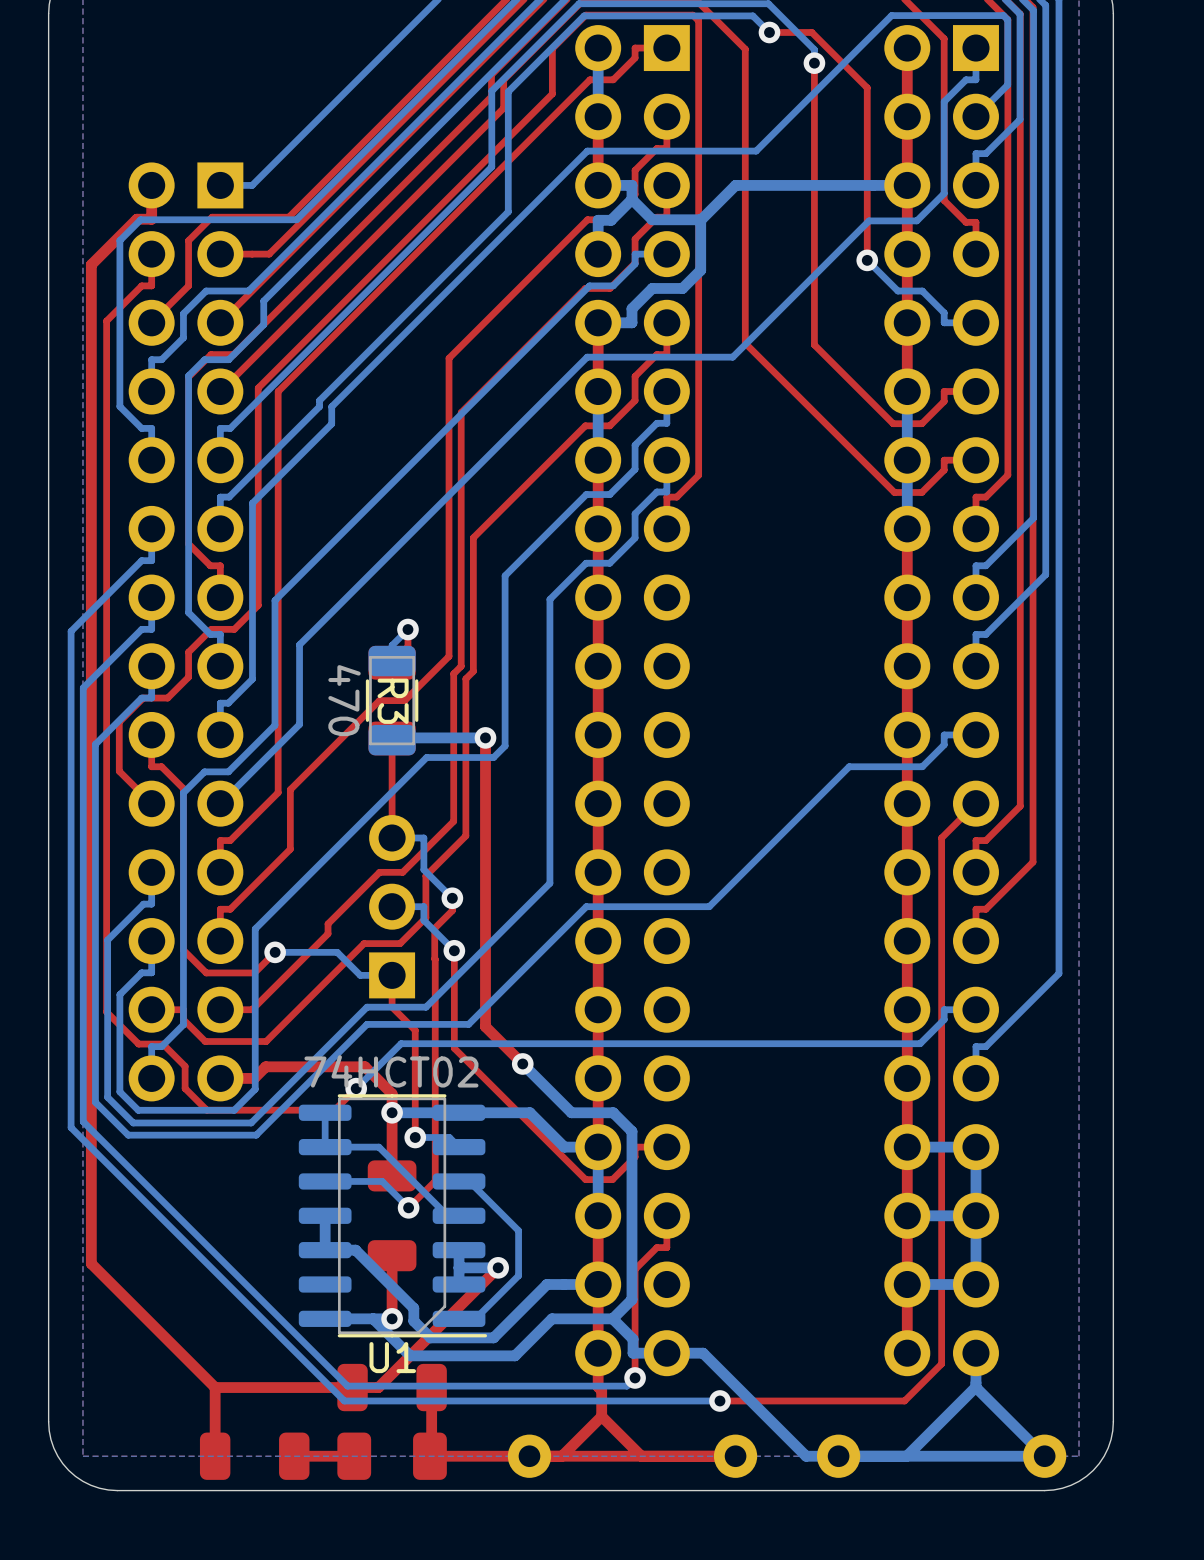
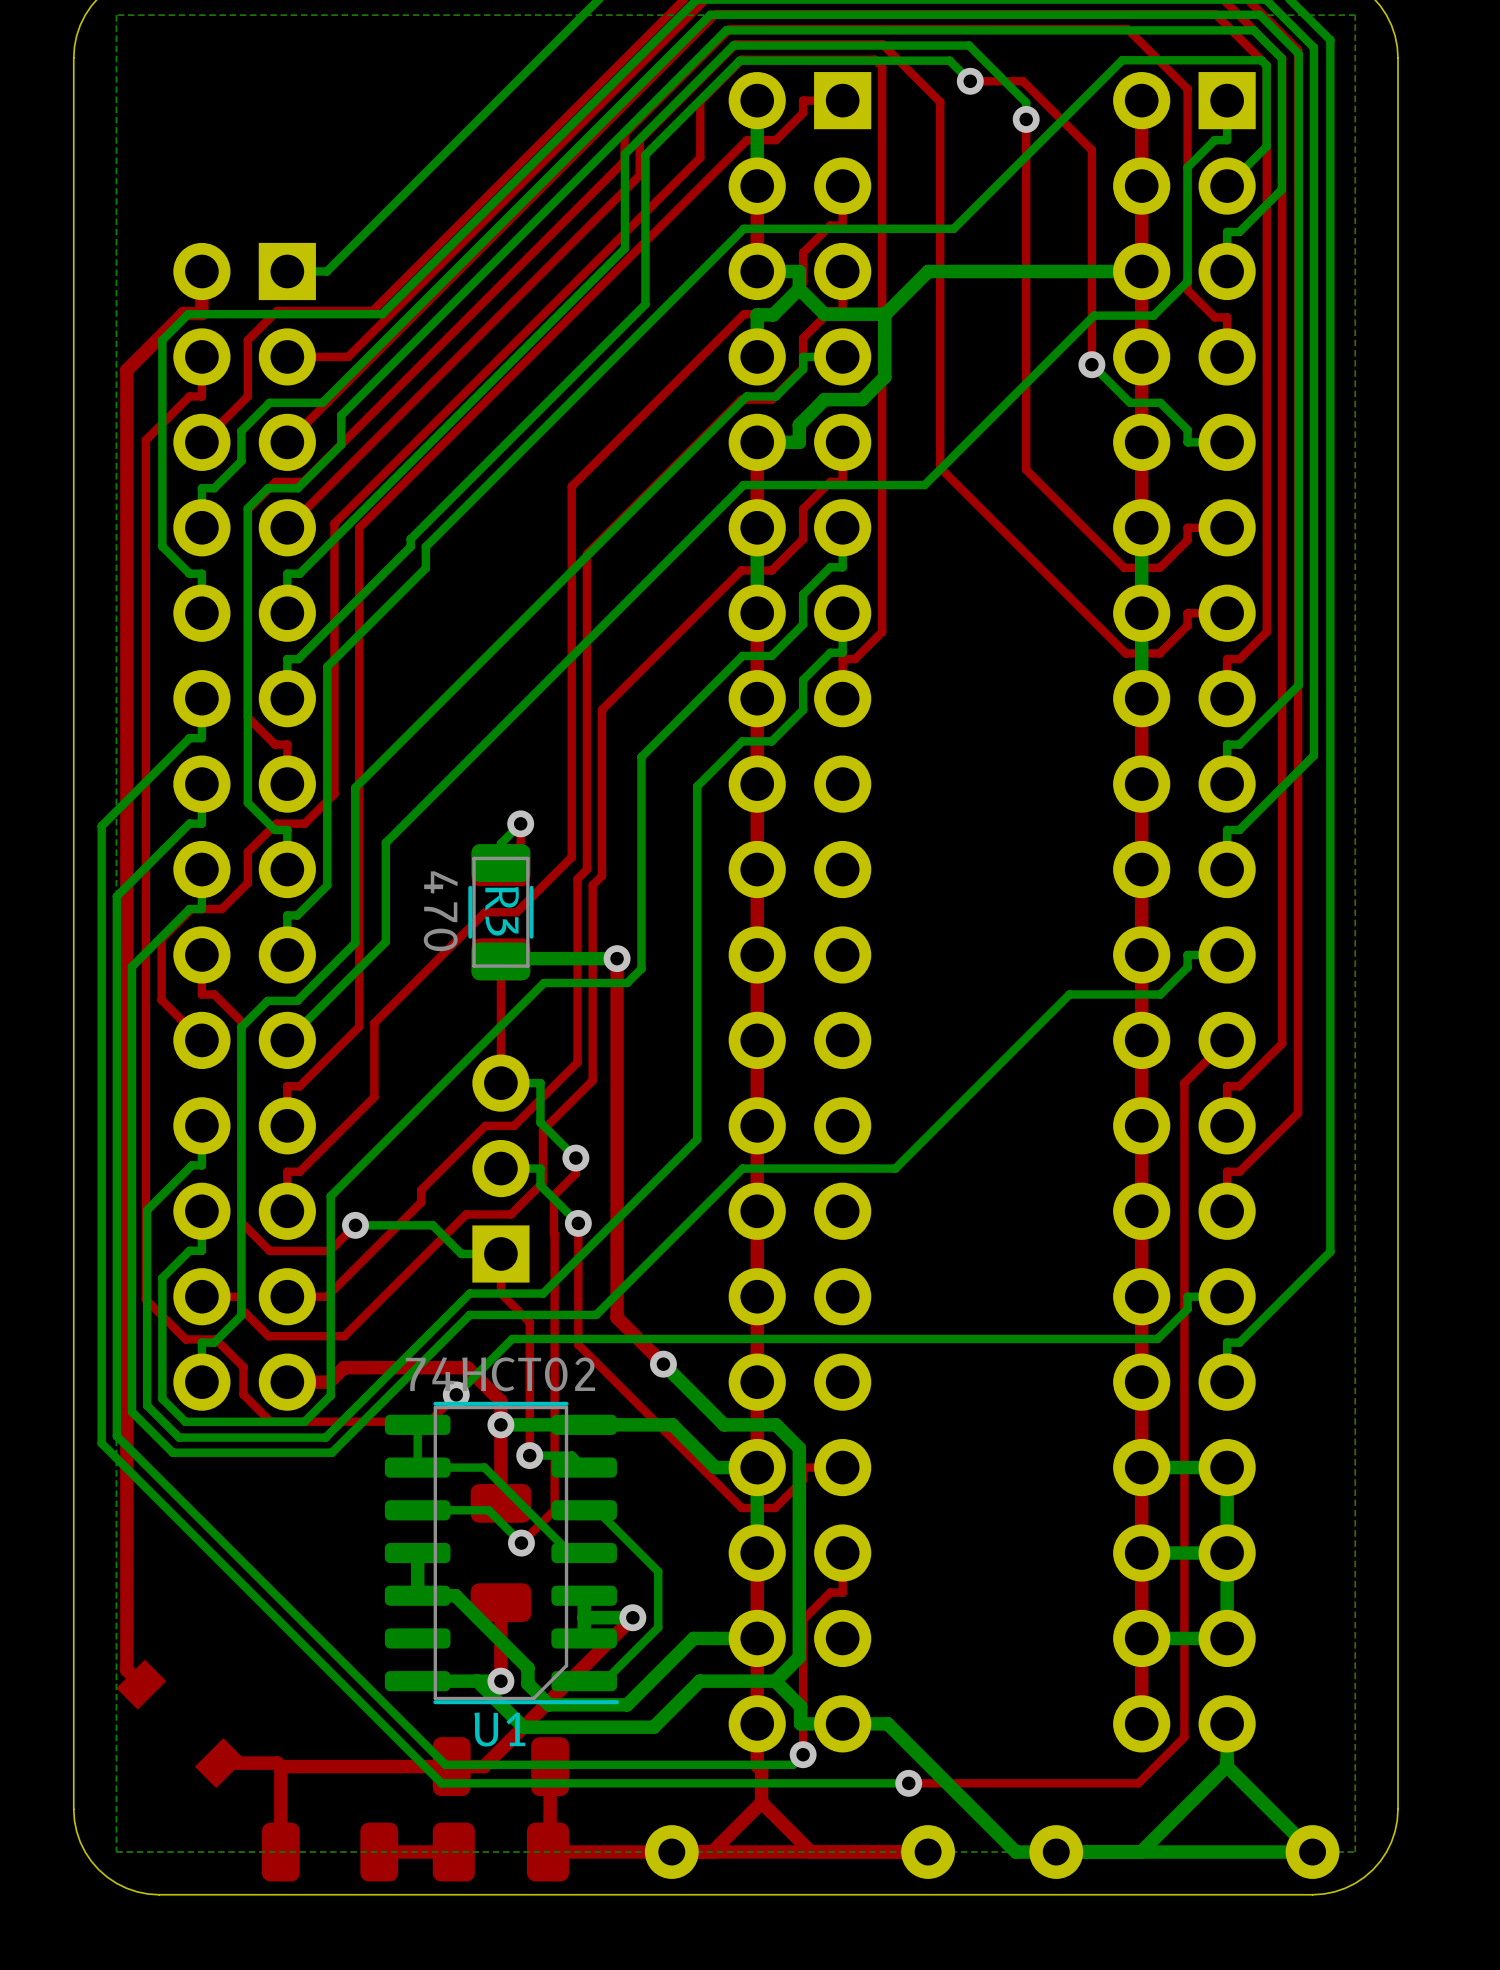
top track: (91, 1263) (212, 1384) -> (126, 1612) (126, 1670) (141, 1684)
part: none -> (180, 1723)
top track: none -> (277, 1763) (219, 1763)

